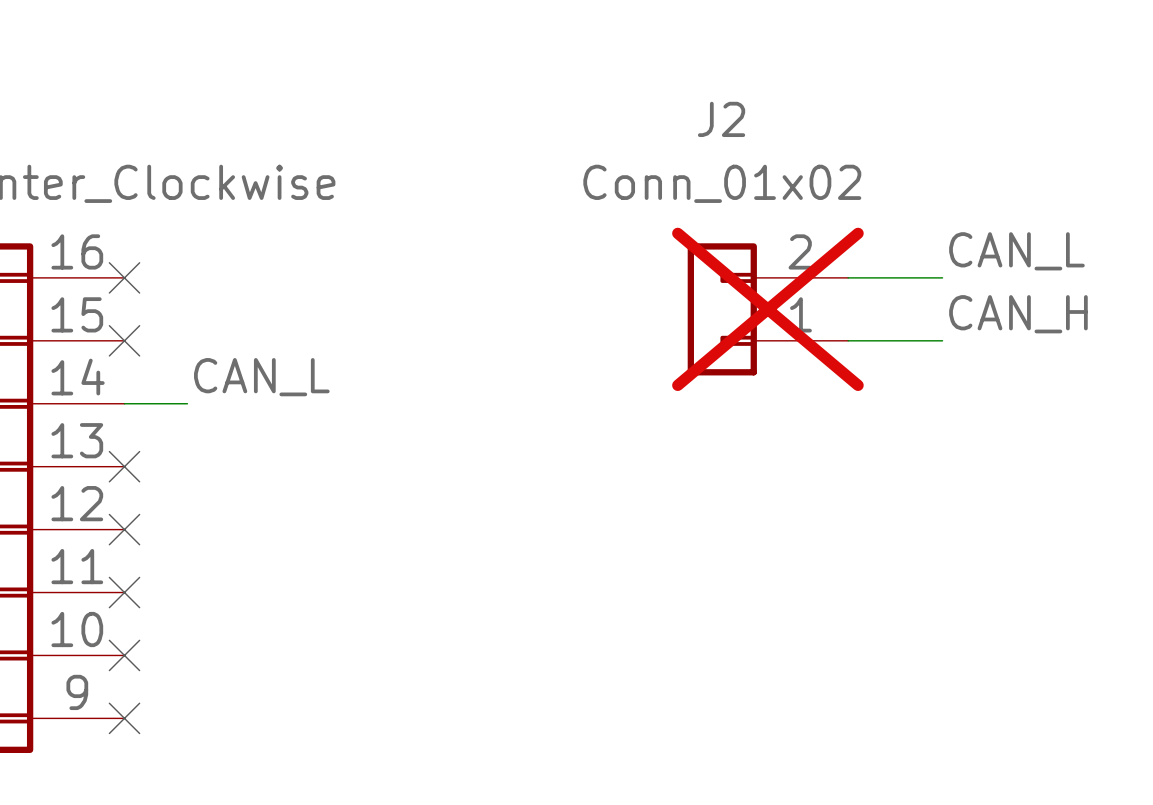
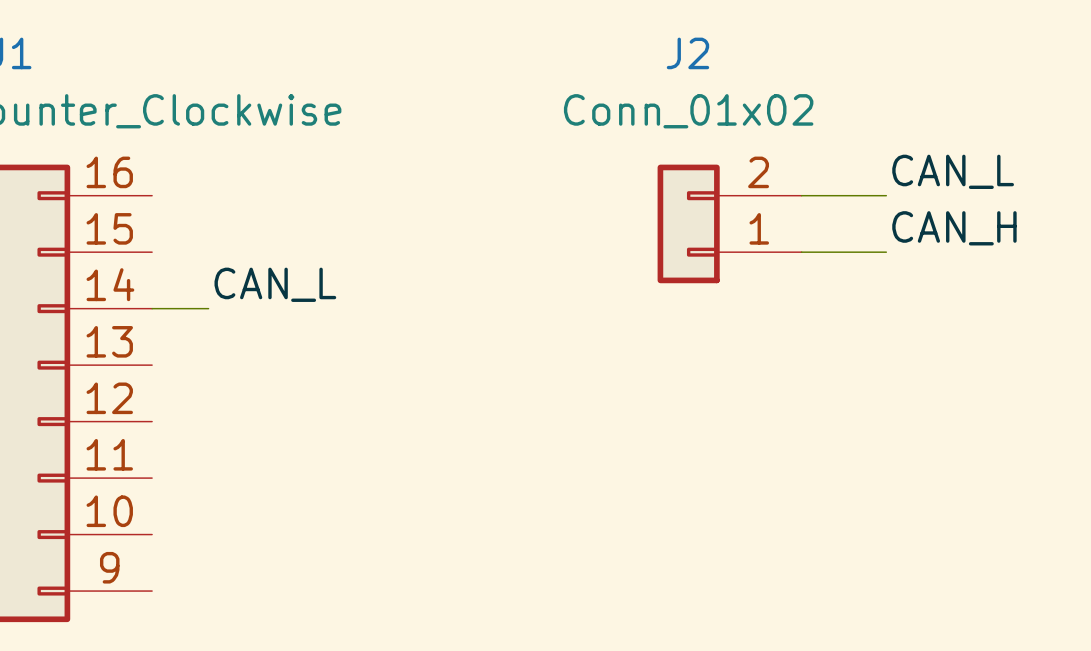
no-connect mark: (124, 277) -> none
J2 do-not-place cross: (767, 309) -> none
no-connect mark: (124, 340) -> none
no-connect mark: (124, 466) -> none
no-connect mark: (124, 529) -> none
no-connect mark: (124, 592) -> none
no-connect mark: (124, 655) -> none
no-connect mark: (124, 718) -> none

